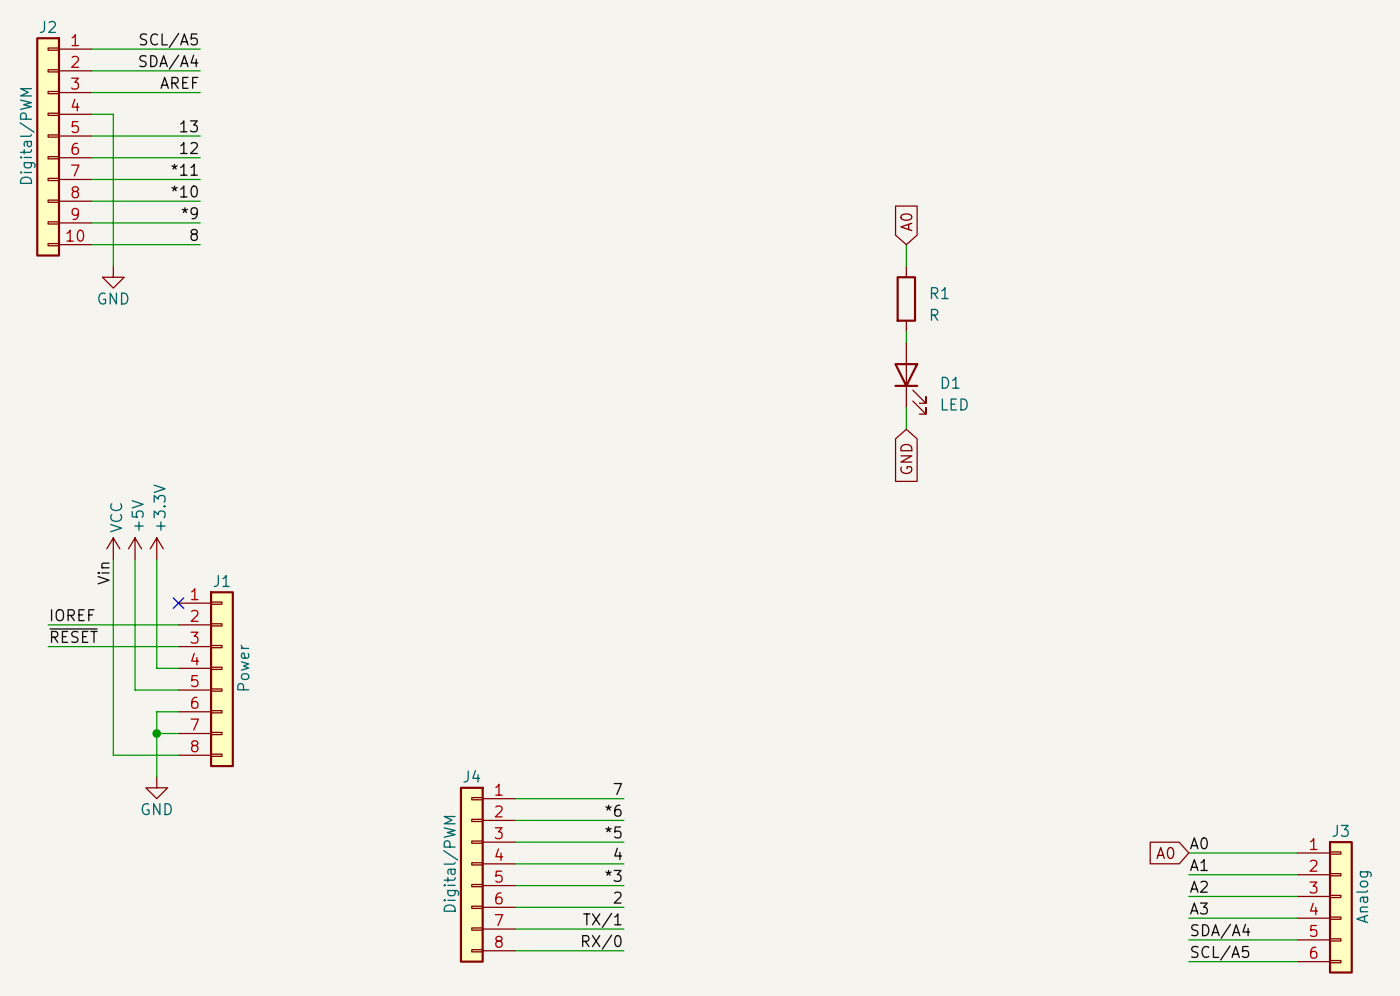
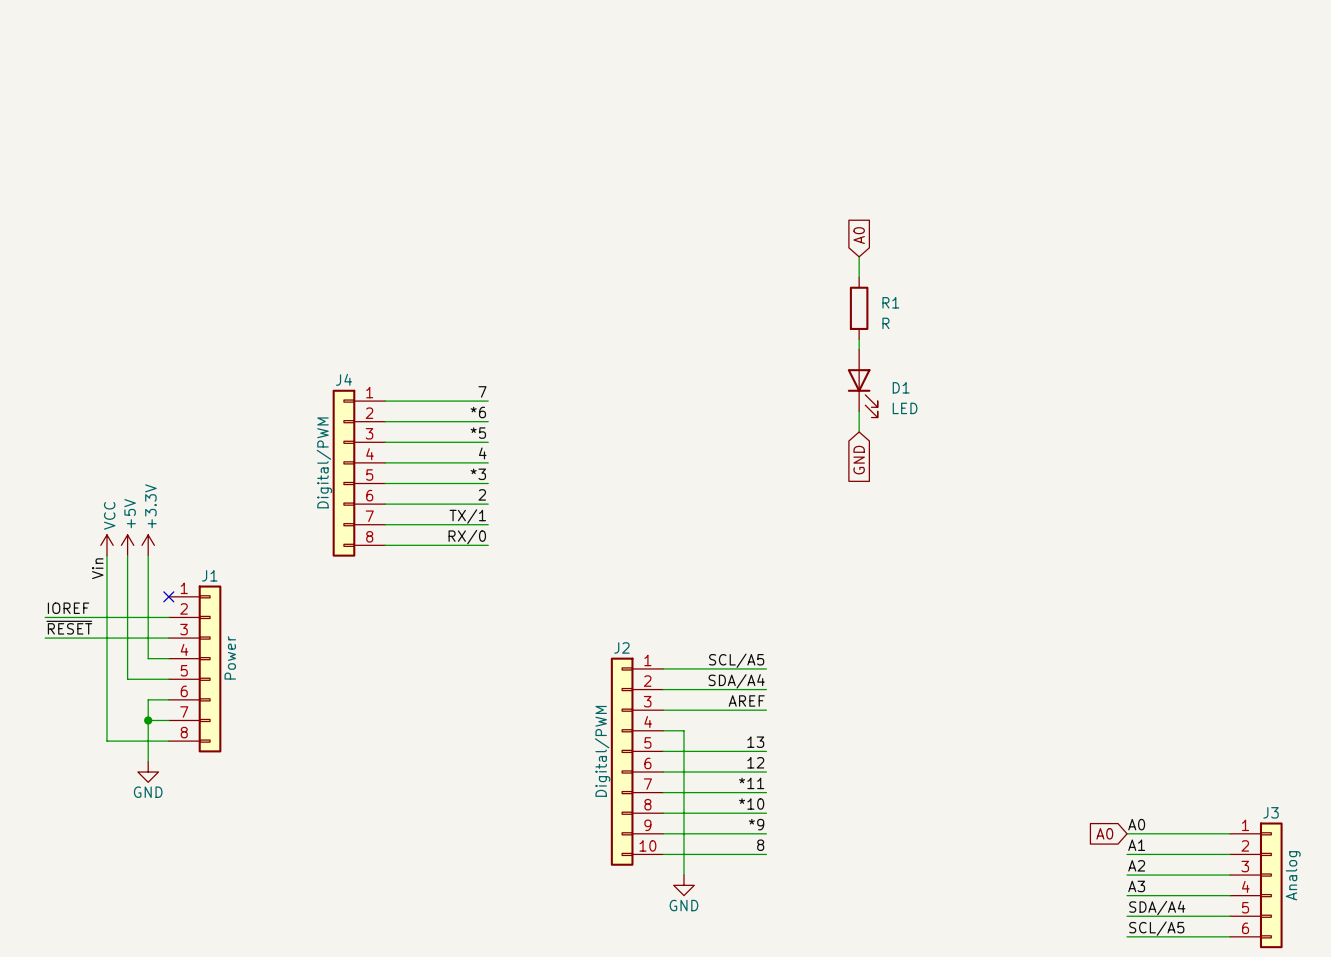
label: SCL/A5 (168, 40) -> none
wire: (91, 49) (200, 49) -> none
label: SDA/A4 (168, 62) -> none
wire: (91, 70) (200, 70) -> none
label: AREF (179, 82) -> none
wire: (91, 92) (200, 92) -> none
wire: (91, 114) (113, 114) (113, 266) -> none
label: 13 (189, 126) -> none
wire: (91, 136) (200, 136) -> none
J2 position: (63, 146) -> (637, 761)
label: 12 (189, 148) -> none
wire: (91, 157) (200, 157) -> none
label: *11 (184, 169) -> none
wire: (91, 179) (200, 179) -> none
label: *10 (184, 191) -> none
wire: (91, 201) (200, 201) -> none
label: *9 (189, 213) -> none
wire: (91, 222) (200, 222) -> none
label: 8 (194, 234) -> none
wire: (91, 244) (200, 244) -> none
power symbol: GND (113, 277) -> none
label: none -> 7 (482, 391)
wire: none -> (385, 401) (488, 401)
label: none -> *6 (478, 412)
wire: none -> (385, 421) (488, 421)
label: none -> *5 (478, 433)
wire: none -> (385, 442) (488, 442)
label: none -> 4 (482, 453)
wire: none -> (385, 462) (488, 462)
label: none -> *3 (478, 474)
wire: none -> (385, 483) (488, 483)
label: none -> 2 (482, 494)
wire: none -> (385, 504) (488, 504)
label: none -> TX/1 (467, 516)
wire: none -> (385, 524) (488, 524)
label: none -> RX/0 (467, 537)
wire: none -> (385, 545) (488, 545)
label: none -> SCL/A5 (736, 660)
wire: none -> (663, 668) (766, 668)
label: none -> SDA/A4 (736, 681)
wire: none -> (663, 689) (766, 689)
label: none -> AREF (746, 700)
wire: none -> (663, 730) (683, 730) (683, 875)
label: none -> 13 (755, 742)
label: none -> 12 (755, 762)
label: 7 (617, 788) -> none
wire: (515, 798) (623, 798) -> (663, 710) (766, 710)
label: none -> *11 (751, 783)
label: *6 (613, 810) -> none
wire: (515, 820) (623, 820) -> none
label: none -> *10 (751, 804)
label: *5 (613, 832) -> none
wire: (515, 842) (623, 842) -> (663, 751) (766, 751)
label: none -> *9 (756, 824)
label: 4 (618, 853) -> none
wire: (515, 863) (623, 863) -> (663, 772) (766, 772)
label: none -> 8 (760, 845)
J4 position: (487, 874) -> (358, 473)
label: *3 (613, 875) -> none
wire: (515, 885) (623, 885) -> (663, 792) (766, 792)
label: 2 (617, 897) -> none
wire: (515, 907) (623, 907) -> (663, 813) (766, 813)
power symbol: none -> GND (683, 885)
label: TX/1 (602, 920) -> none
wire: (515, 929) (623, 929) -> (663, 833) (766, 833)
label: RX/0 (601, 942) -> none
wire: (515, 950) (623, 950) -> (663, 854) (766, 854)

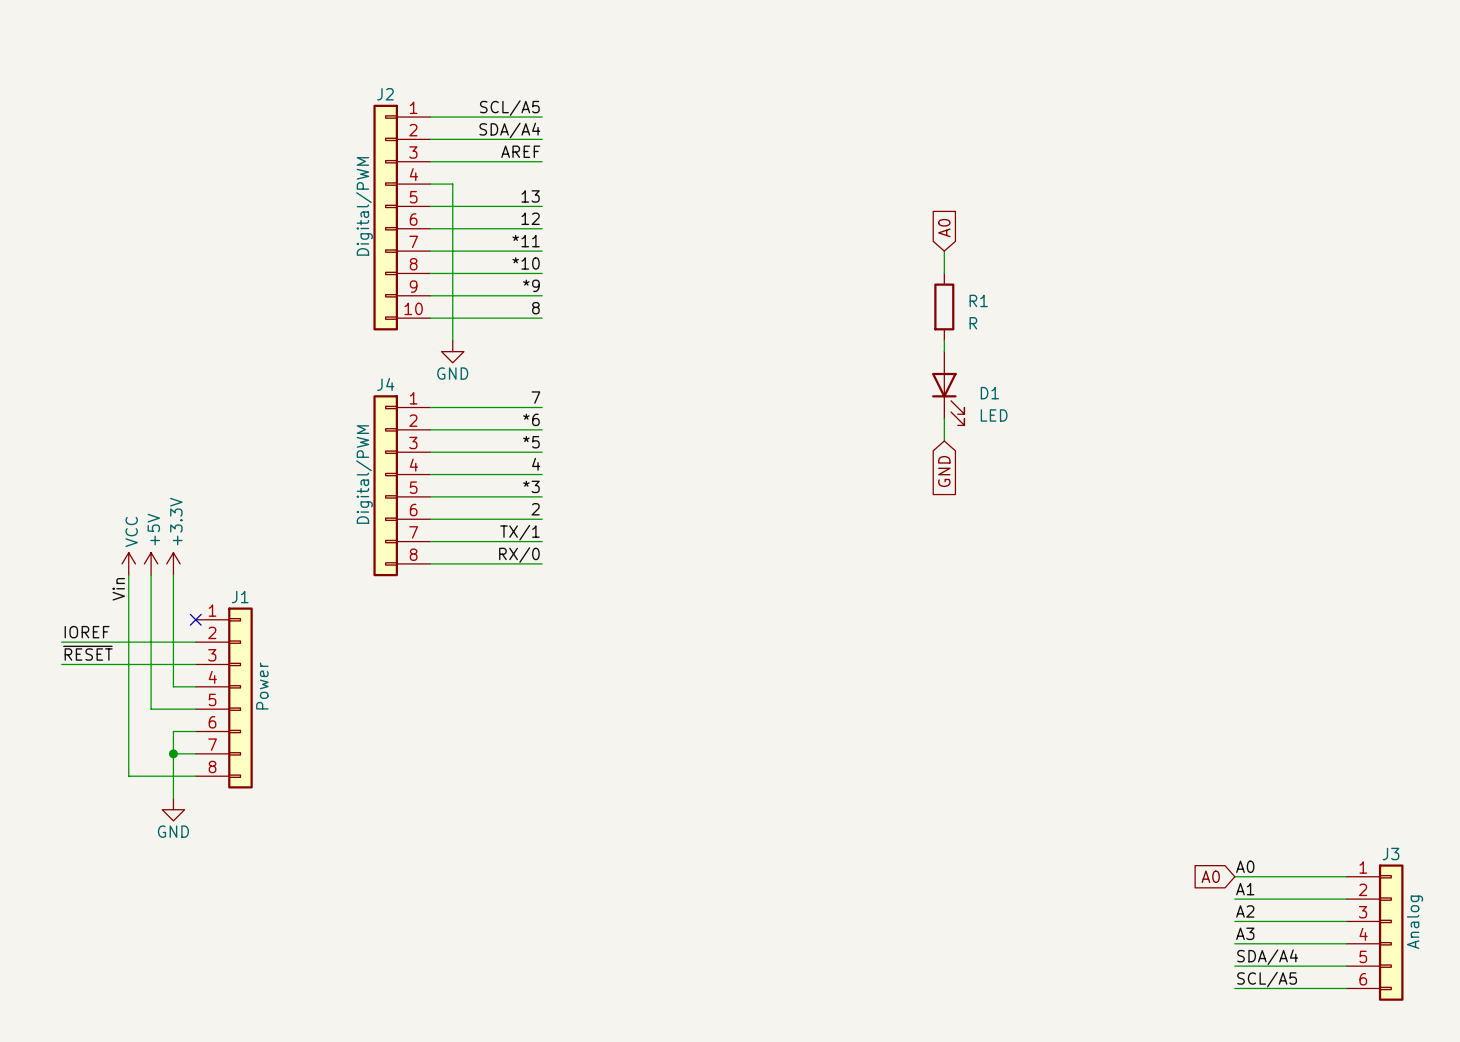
label: none -> SCL/A5 (509, 108)
wire: none -> (430, 117) (542, 117)
label: none -> SDA/A4 (509, 130)
wire: none -> (430, 139) (542, 139)
label: none -> AREF (520, 151)
wire: none -> (430, 161) (542, 161)
wire: none -> (430, 184) (452, 184) (452, 340)
label: none -> 13 (530, 196)
wire: none -> (430, 206) (542, 206)
label: none -> 12 (530, 218)
wire: none -> (430, 228) (542, 228)
label: none -> *11 (526, 241)
wire: none -> (430, 251) (542, 251)
label: none -> *10 (526, 263)
wire: none -> (430, 273) (542, 273)
label: none -> *9 (531, 285)
wire: none -> (430, 295) (542, 295)
label: none -> 8 (535, 308)
wire: none -> (430, 318) (542, 318)
power symbol: none -> GND (452, 351)
label: SCL/A5 (736, 660) -> none
wire: (663, 668) (766, 668) -> none
label: SDA/A4 (736, 681) -> none
wire: (663, 689) (766, 689) -> none
label: AREF (746, 700) -> none
wire: (663, 710) (766, 710) -> none
wire: (663, 730) (683, 730) (683, 875) -> none
label: 13 (755, 742) -> none
wire: (663, 751) (766, 751) -> none
J2 position: (637, 761) -> (401, 217)
label: 12 (755, 762) -> none
wire: (663, 772) (766, 772) -> none
label: *11 (751, 783) -> none
wire: (663, 792) (766, 792) -> none
label: *10 (751, 804) -> none
wire: (663, 813) (766, 813) -> none
label: *9 (756, 824) -> none
wire: (663, 833) (766, 833) -> none
label: 8 (760, 845) -> none
wire: (663, 854) (766, 854) -> none
power symbol: GND (683, 885) -> none

